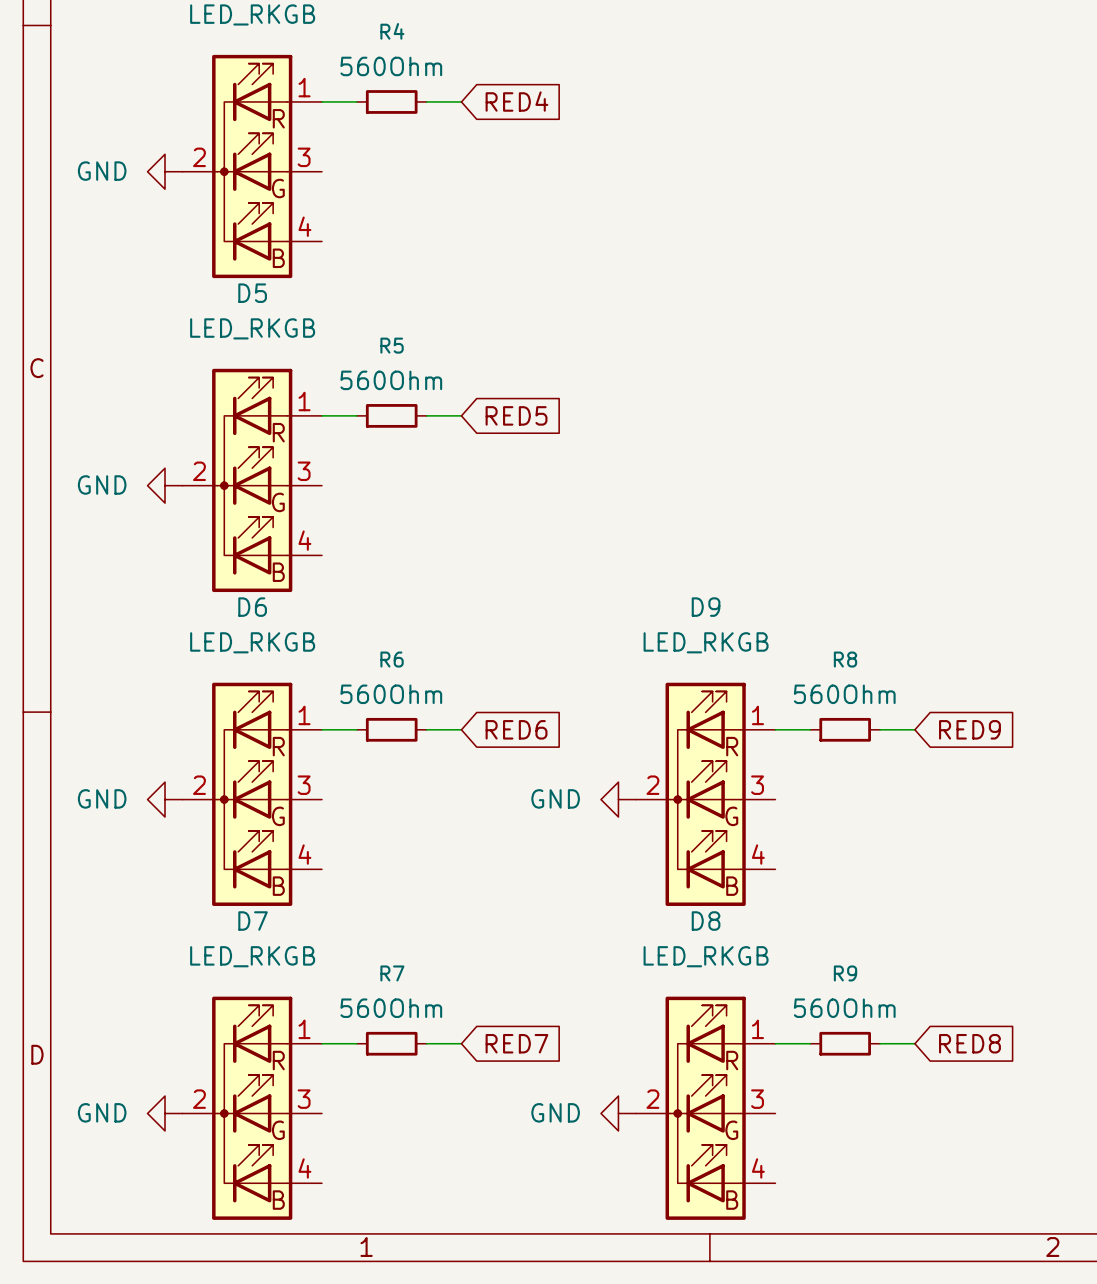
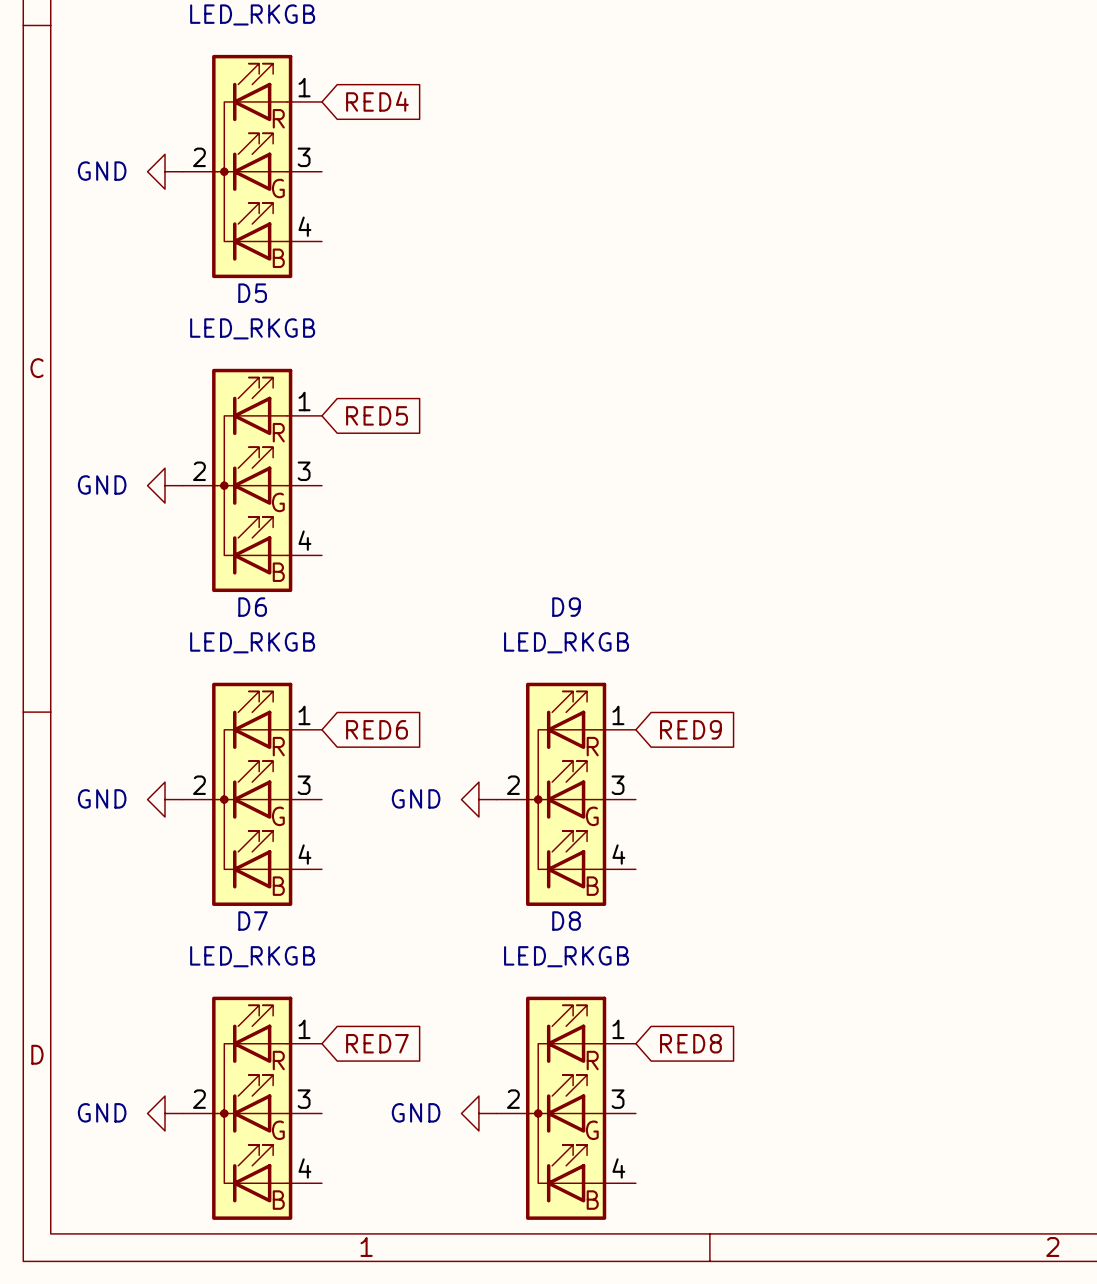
wire: (321, 101) (356, 101) -> none
R4: 560Ohm (391, 101) -> none
wire: (426, 101) (461, 101) -> none
global label position: RED4 (516, 101) -> RED4 (377, 101)
wire: (321, 415) (356, 415) -> none
R5: 560Ohm (391, 415) -> none
wire: (426, 415) (461, 415) -> none
global label position: RED5 (516, 415) -> RED5 (377, 415)
wire: (321, 729) (356, 729) -> none
R6: 560Ohm (391, 729) -> none
wire: (426, 729) (461, 729) -> none
global label position: RED6 (516, 729) -> RED6 (377, 729)
wire: (775, 729) (810, 729) -> none
R8: 560Ohm (845, 729) -> none
wire: (880, 729) (914, 729) -> none
global label position: RED9 (969, 729) -> RED9 (690, 729)
D9 position: (705, 794) -> (566, 794)
power symbol position: GND (618, 799) -> GND (478, 799)
wire: (321, 1043) (356, 1043) -> none
R7: 560Ohm (391, 1043) -> none
wire: (426, 1043) (461, 1043) -> none
global label position: RED7 (516, 1043) -> RED7 (377, 1043)
wire: (775, 1043) (810, 1043) -> none
R9: 560Ohm (845, 1043) -> none
wire: (880, 1043) (914, 1043) -> none
global label position: RED8 (969, 1043) -> RED8 (690, 1043)
D8 position: (705, 1108) -> (566, 1108)
power symbol position: GND (618, 1113) -> GND (478, 1113)

